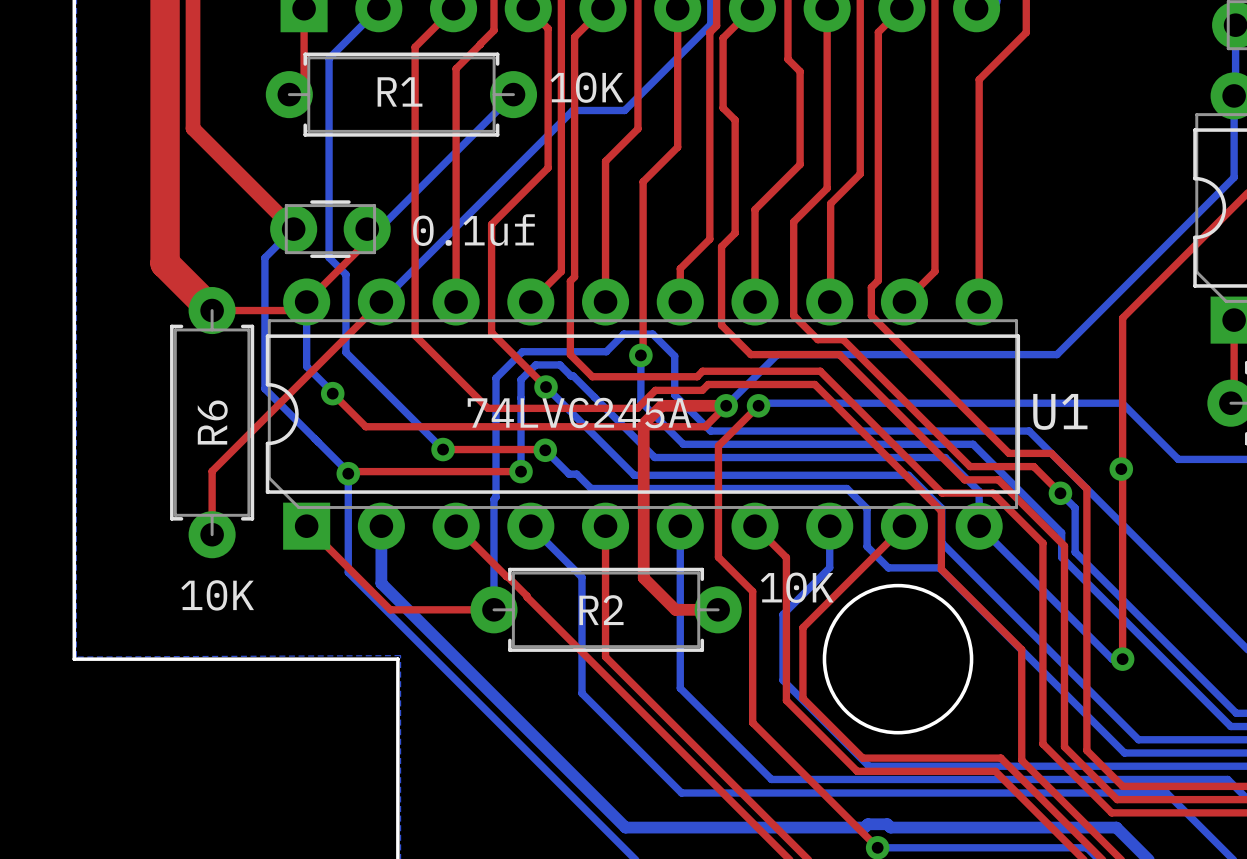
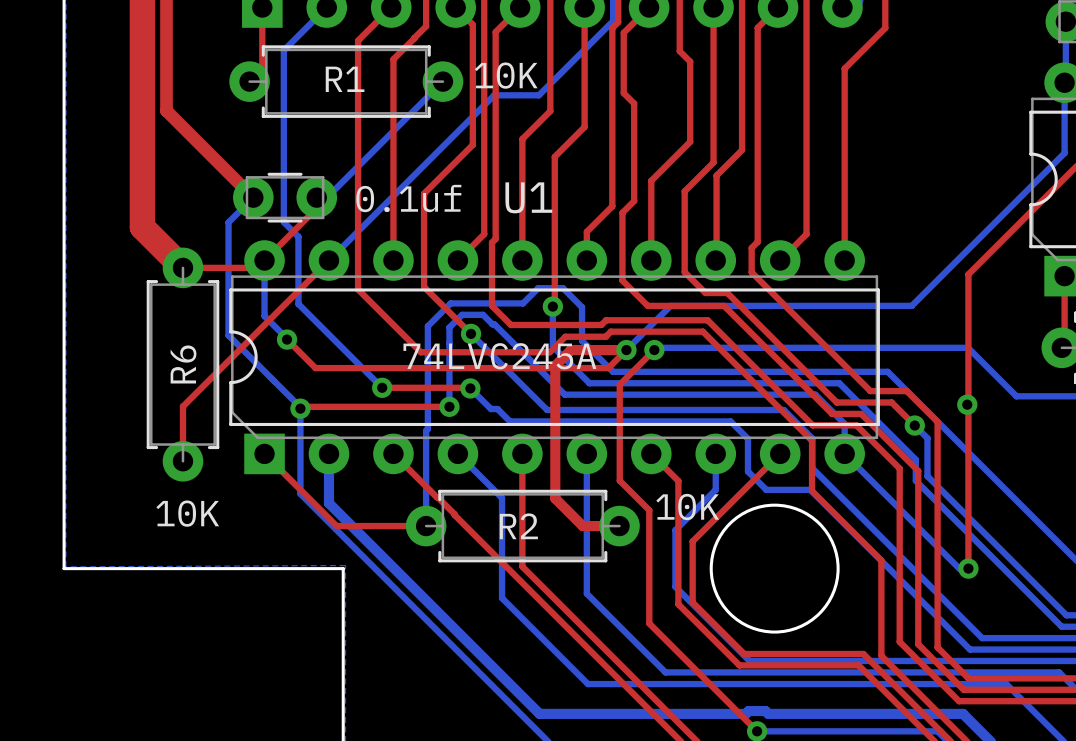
U1 name position: U1 (1060, 411) -> U1 (528, 197)

